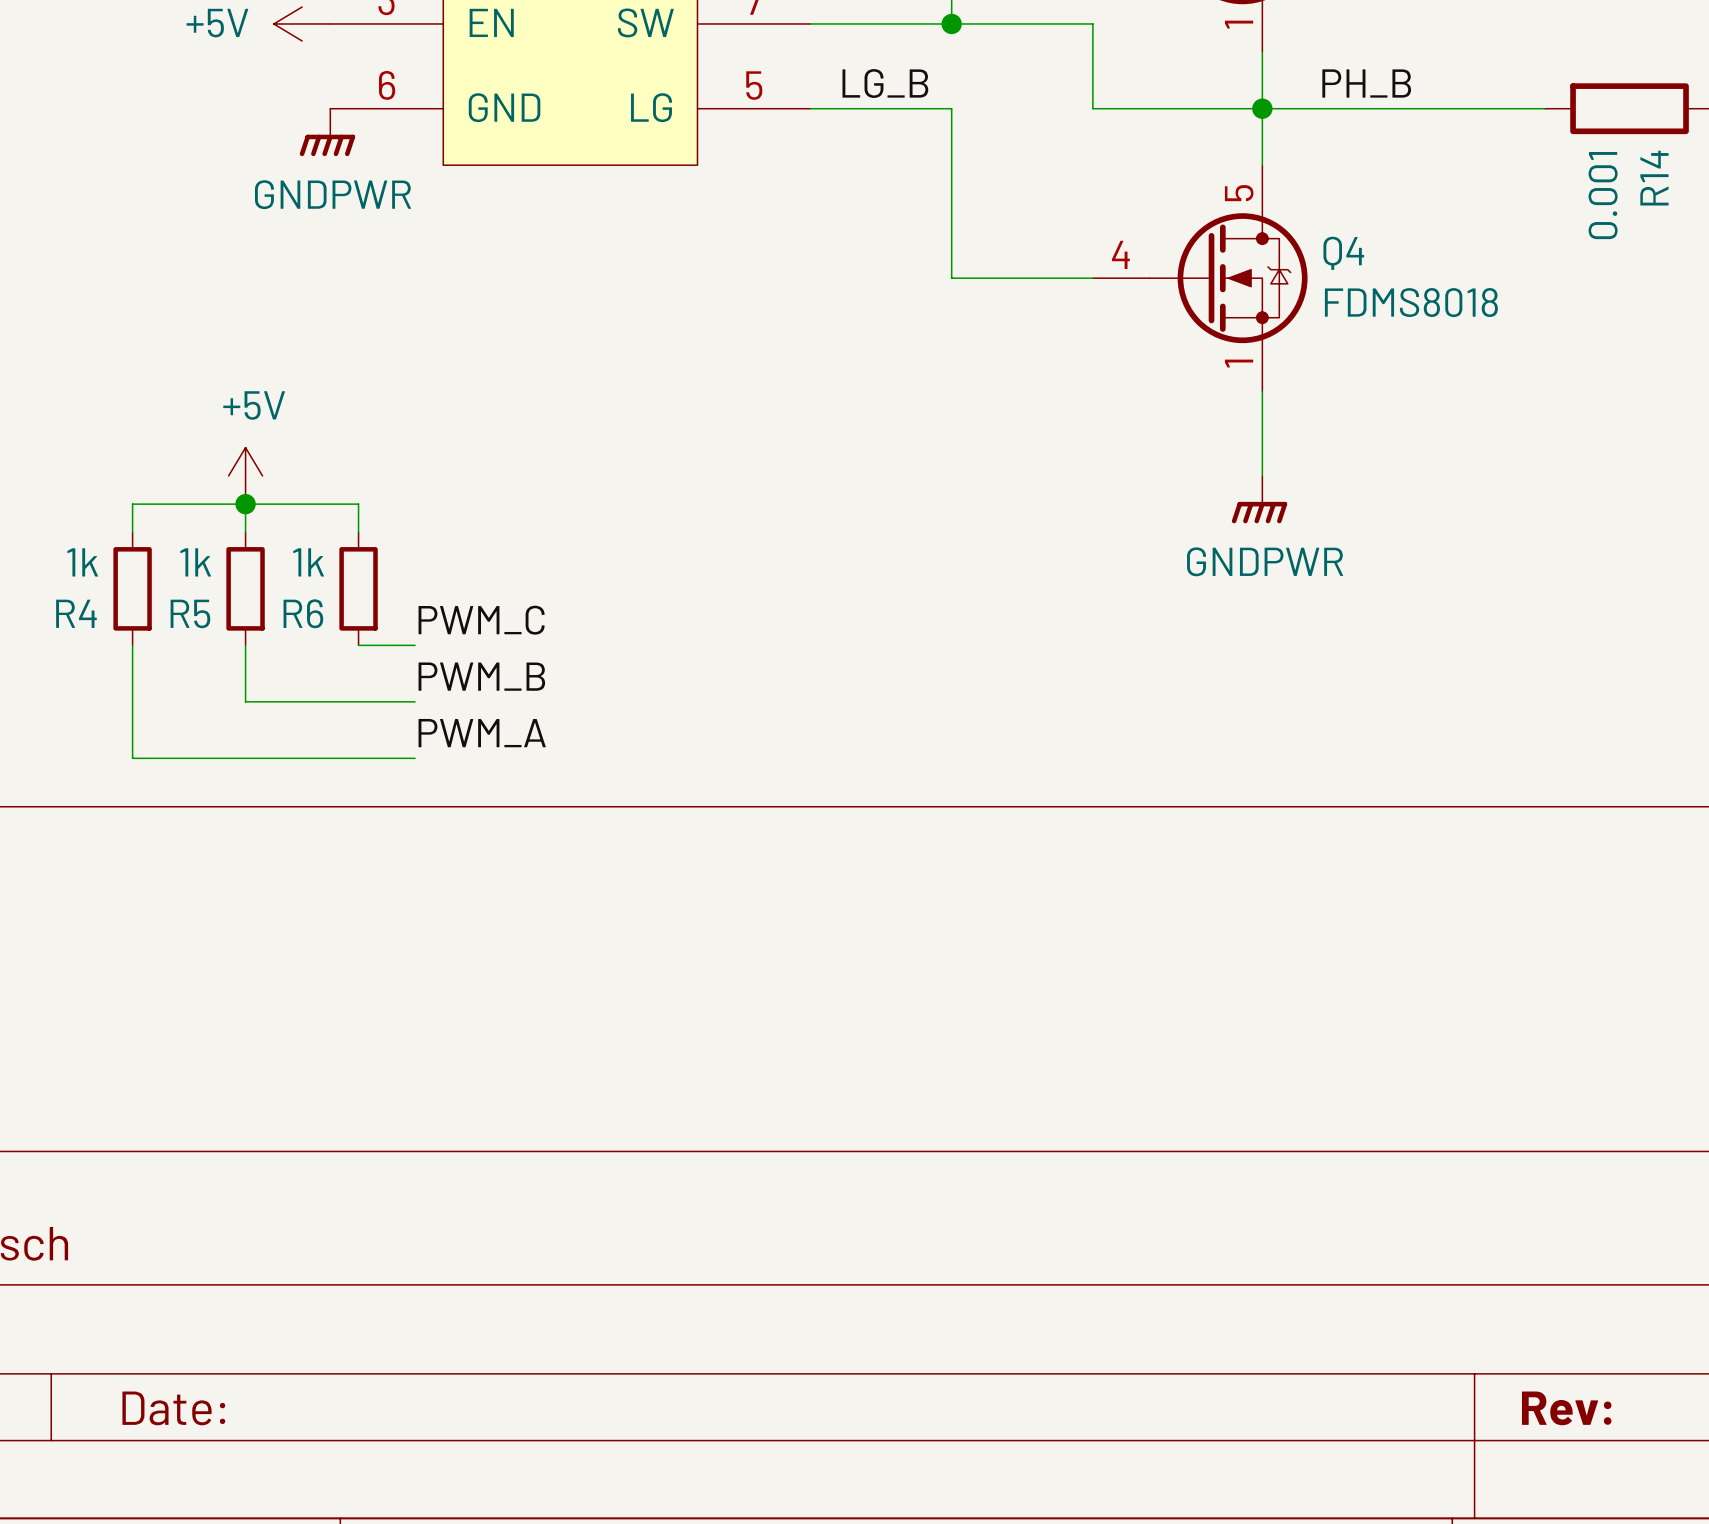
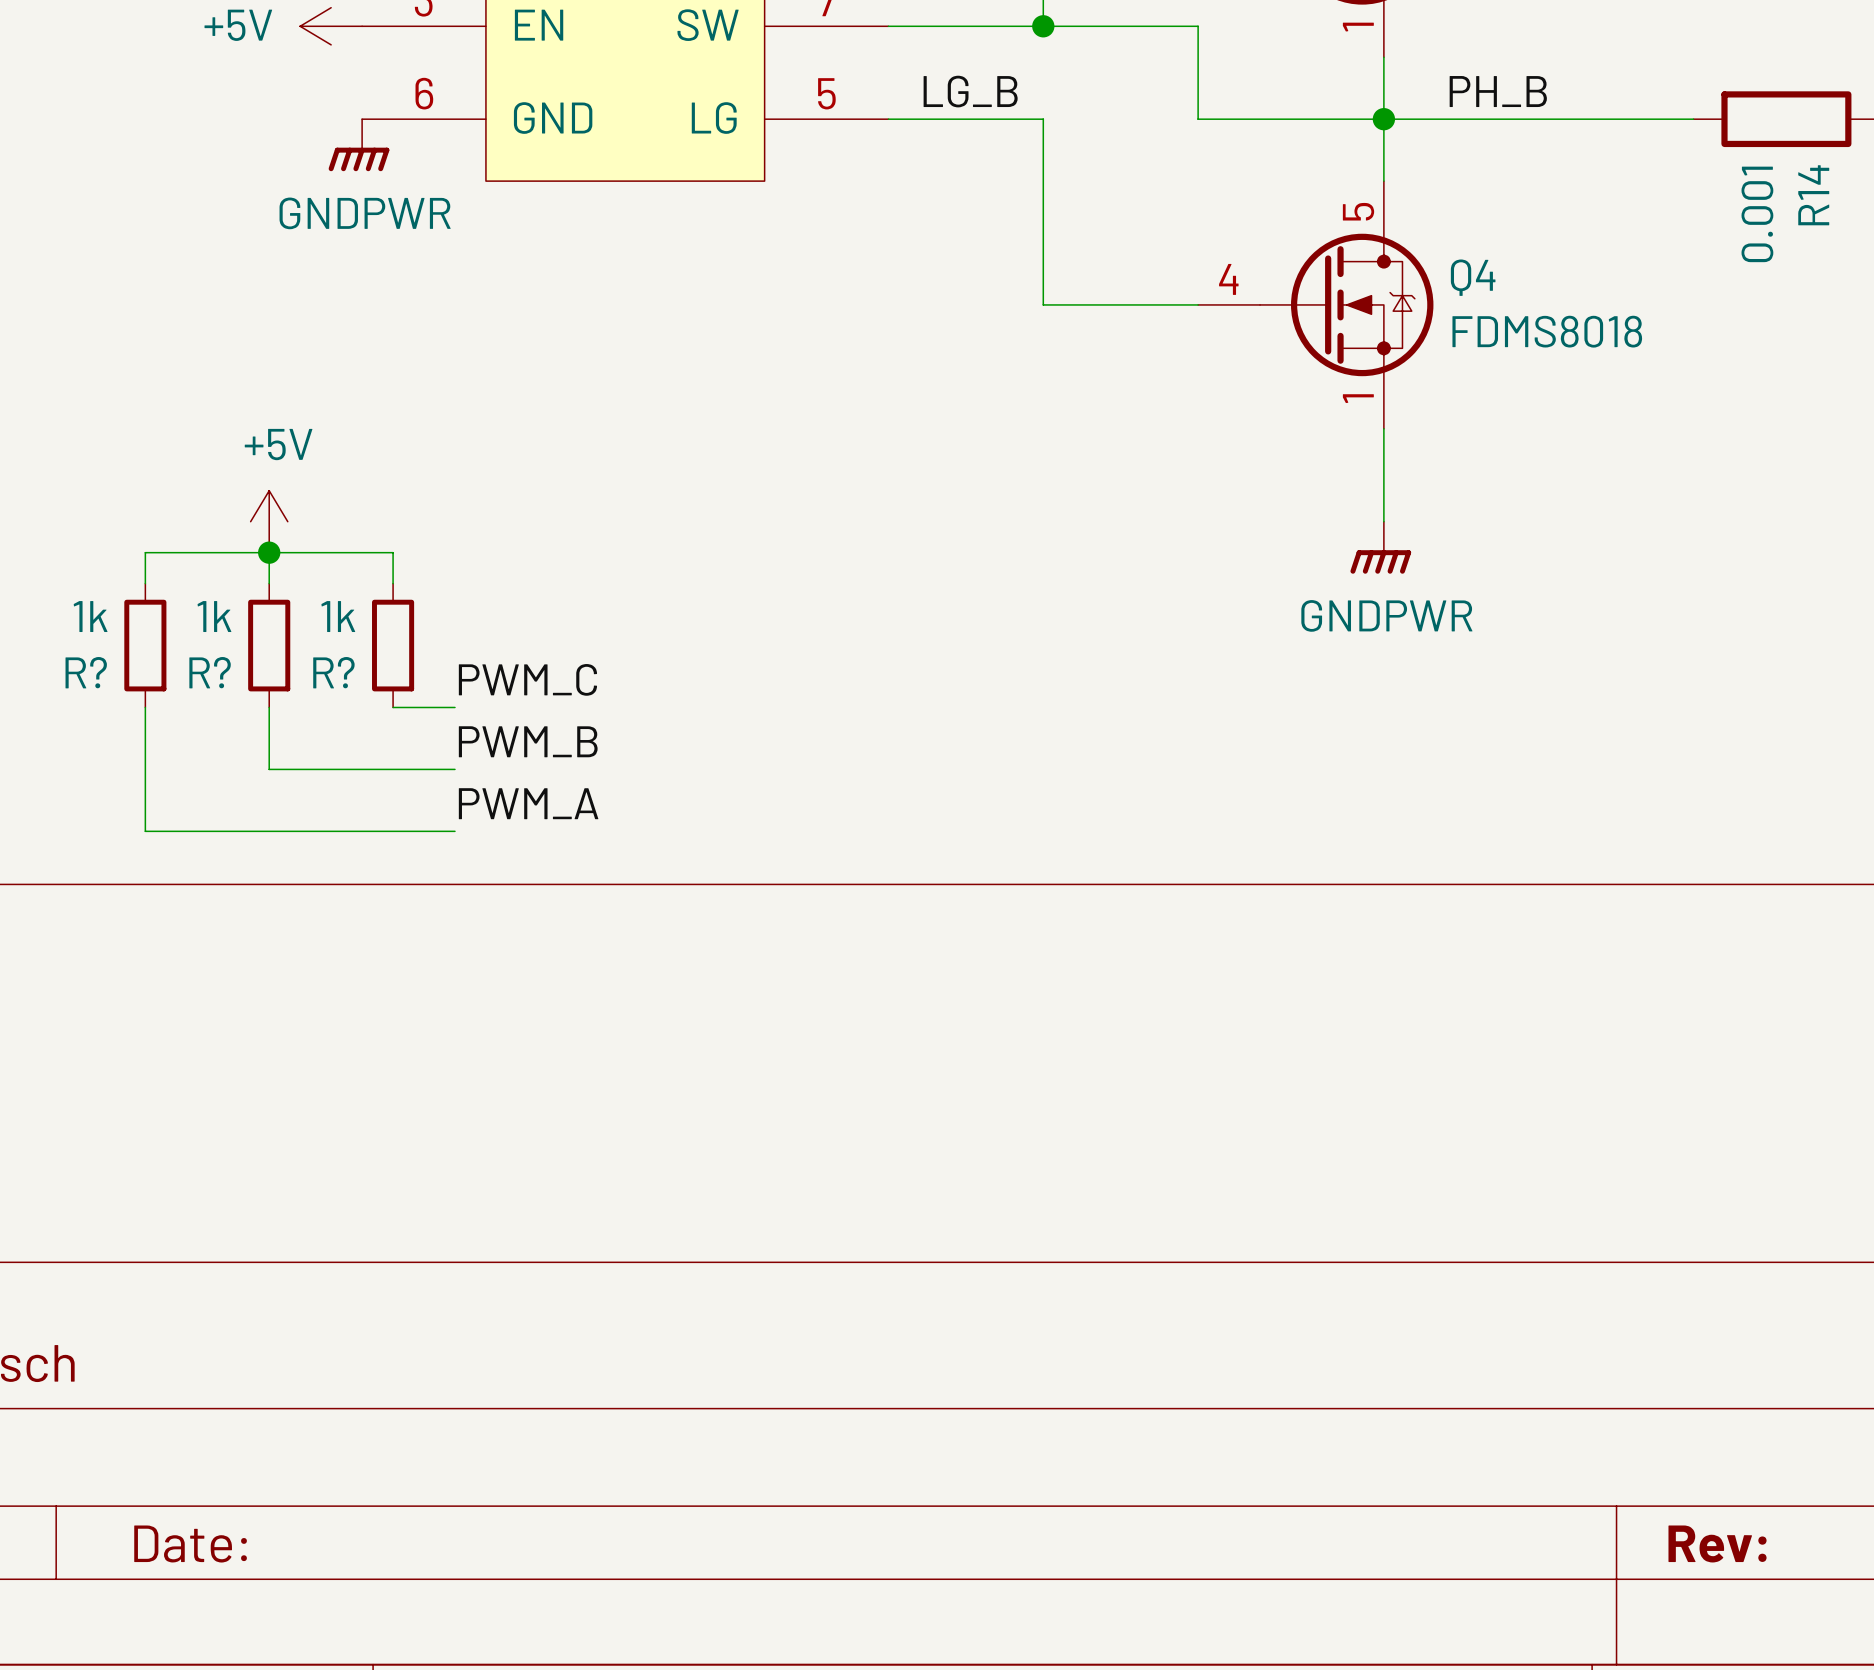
R4 name: R4 (76, 613) -> R? (86, 672)
R5 name: R5 (190, 613) -> R? (210, 672)
R6 name: R6 (303, 613) -> R? (333, 672)

